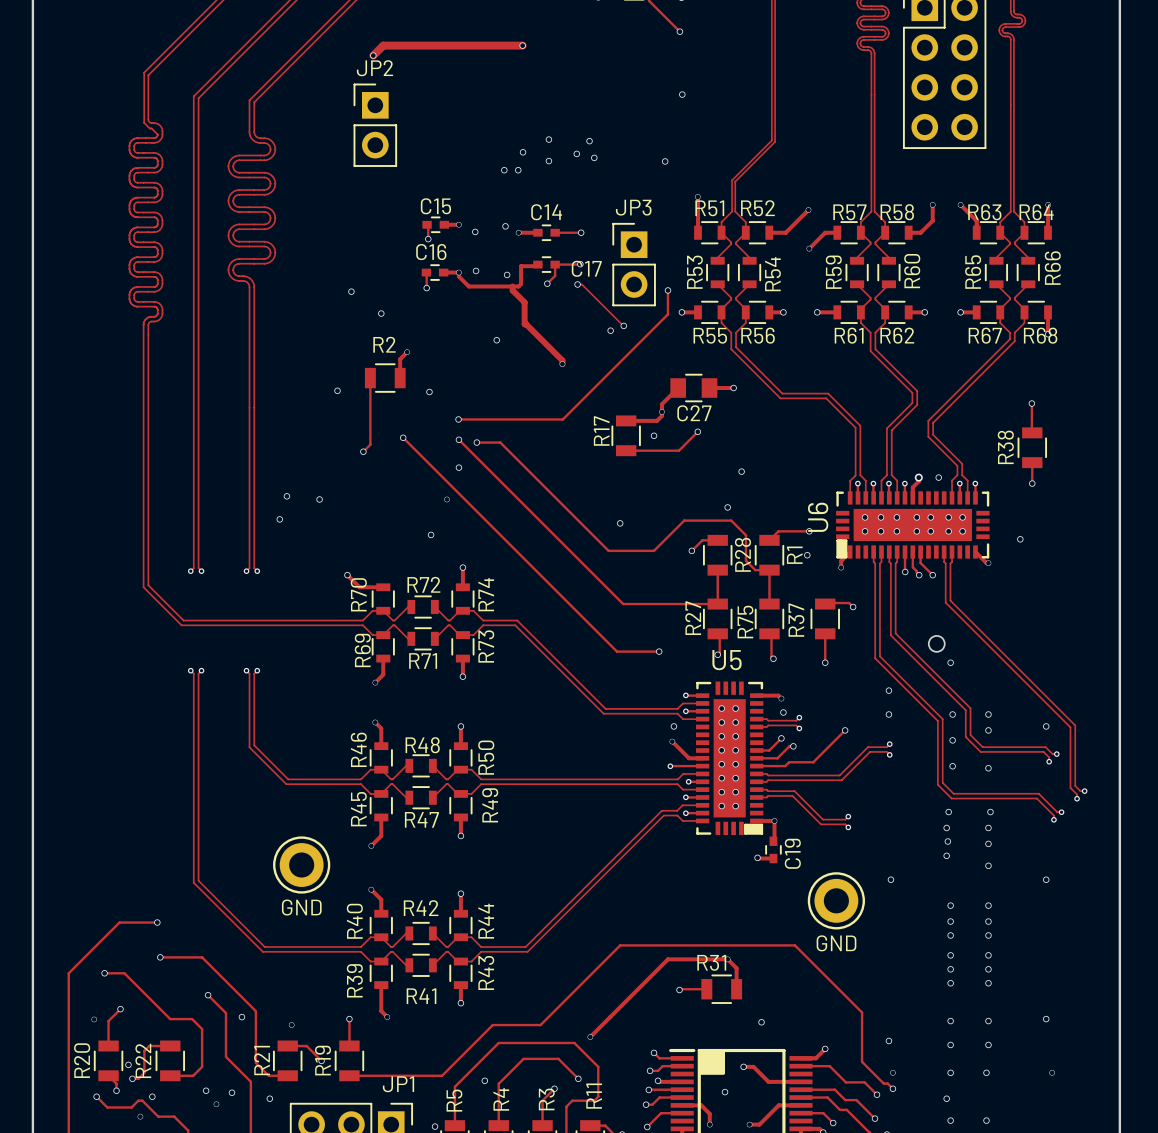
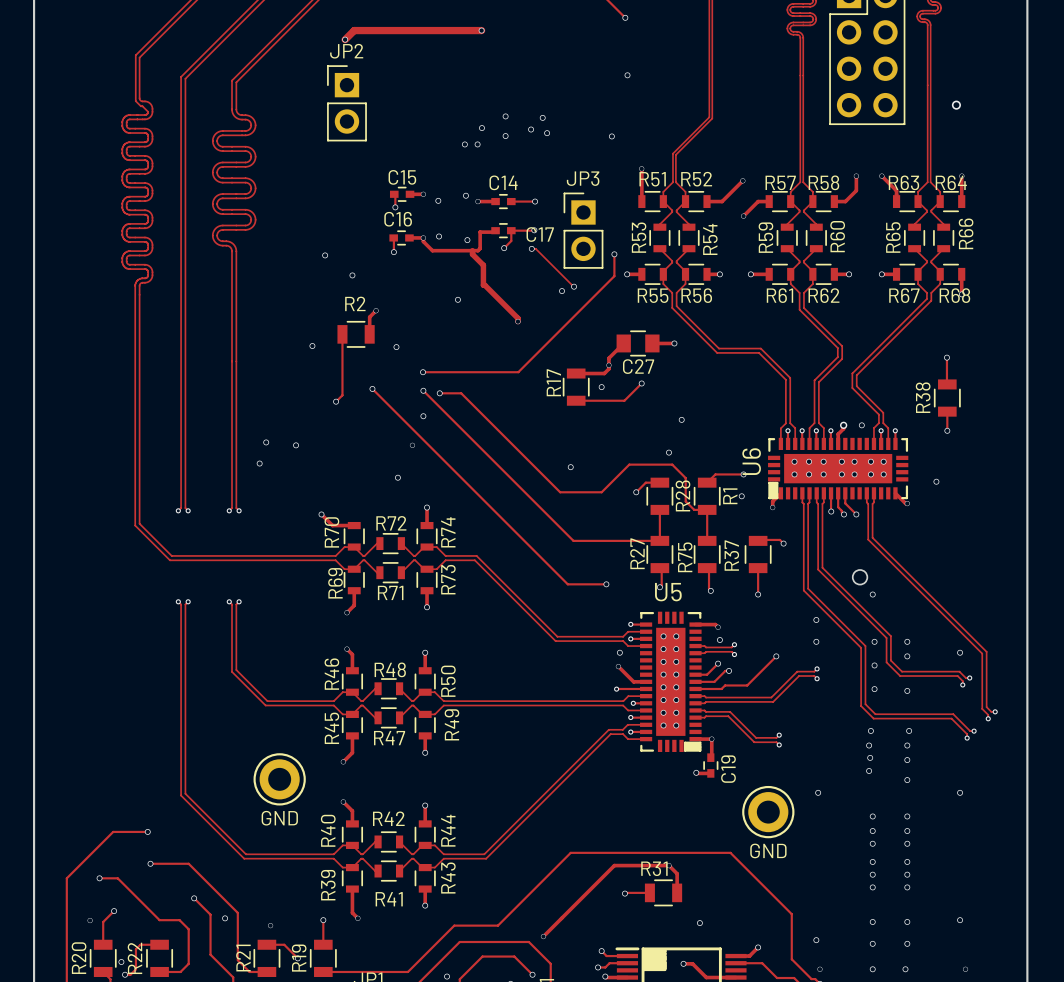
via: none -> (956, 105)

